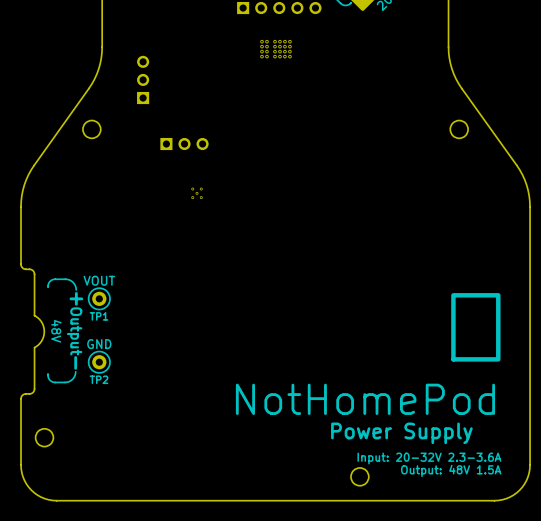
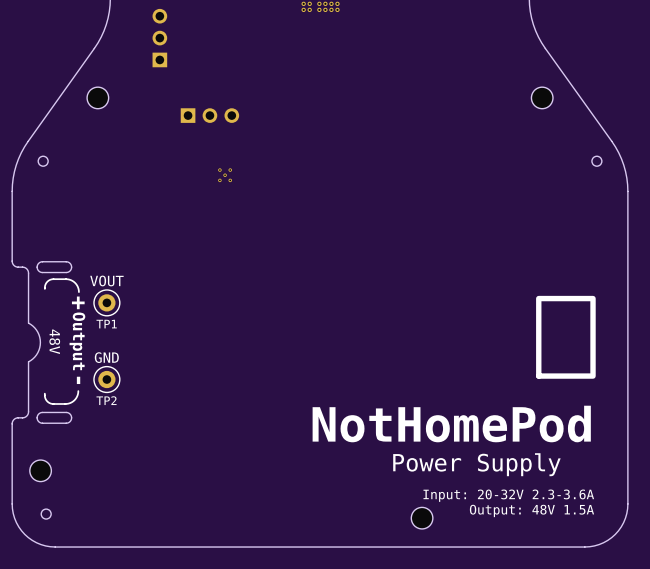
round board edge: none -> [38, 156, 49, 167]
round board edge: none -> [591, 156, 603, 167]
board edge: none -> (66, 261) (41, 261) (37, 264) (37, 268) (41, 272) (67, 272) (71, 266) (66, 261)
board edge: none -> (66, 412) (41, 412) (37, 414) (37, 419) (41, 423) (67, 423) (71, 417) (66, 412)
round board edge: none -> [41, 508, 52, 520]

